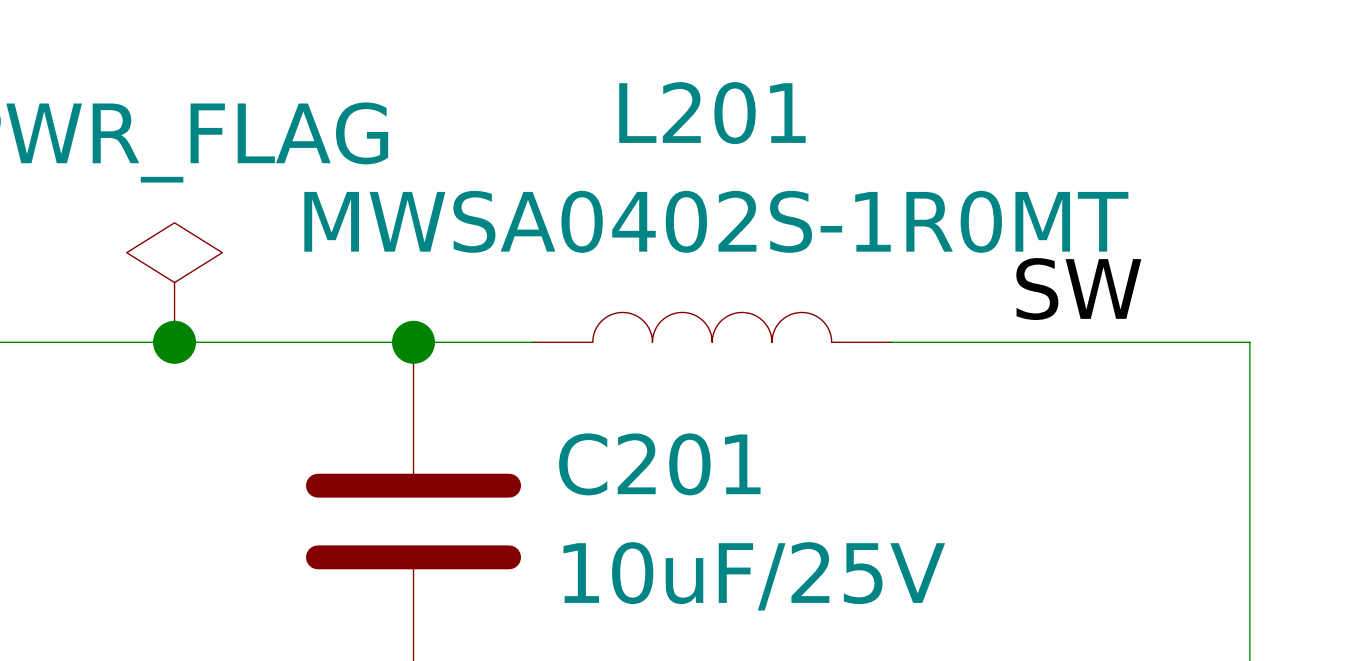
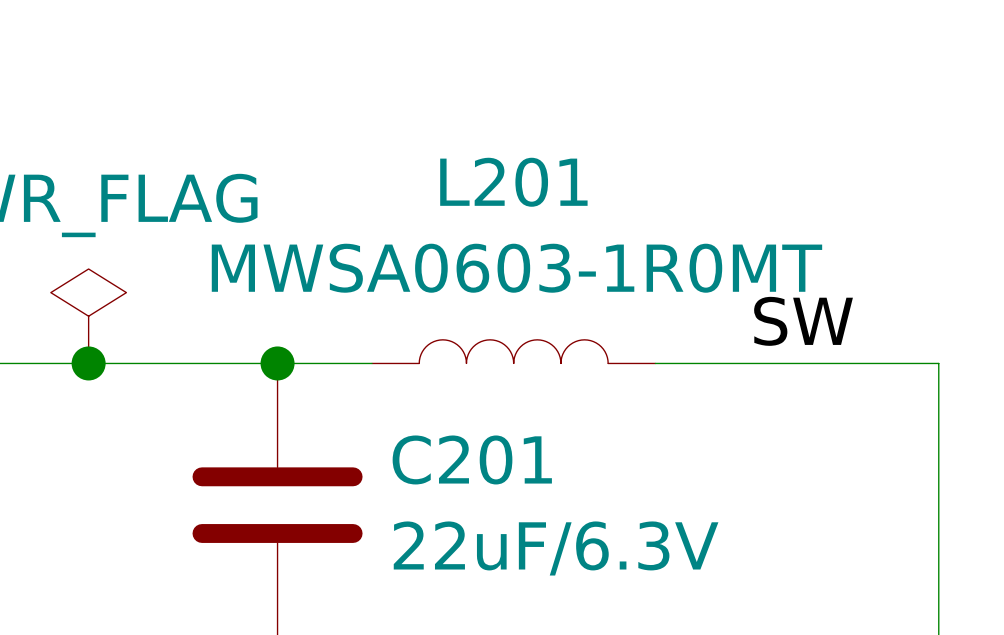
L201 value: MWSA0402S-1R0MT (716, 221) -> MWSA0603-1R0MT (516, 268)
C201 value: 10uF/25V (754, 576) -> 22uF/6.3V (556, 548)

